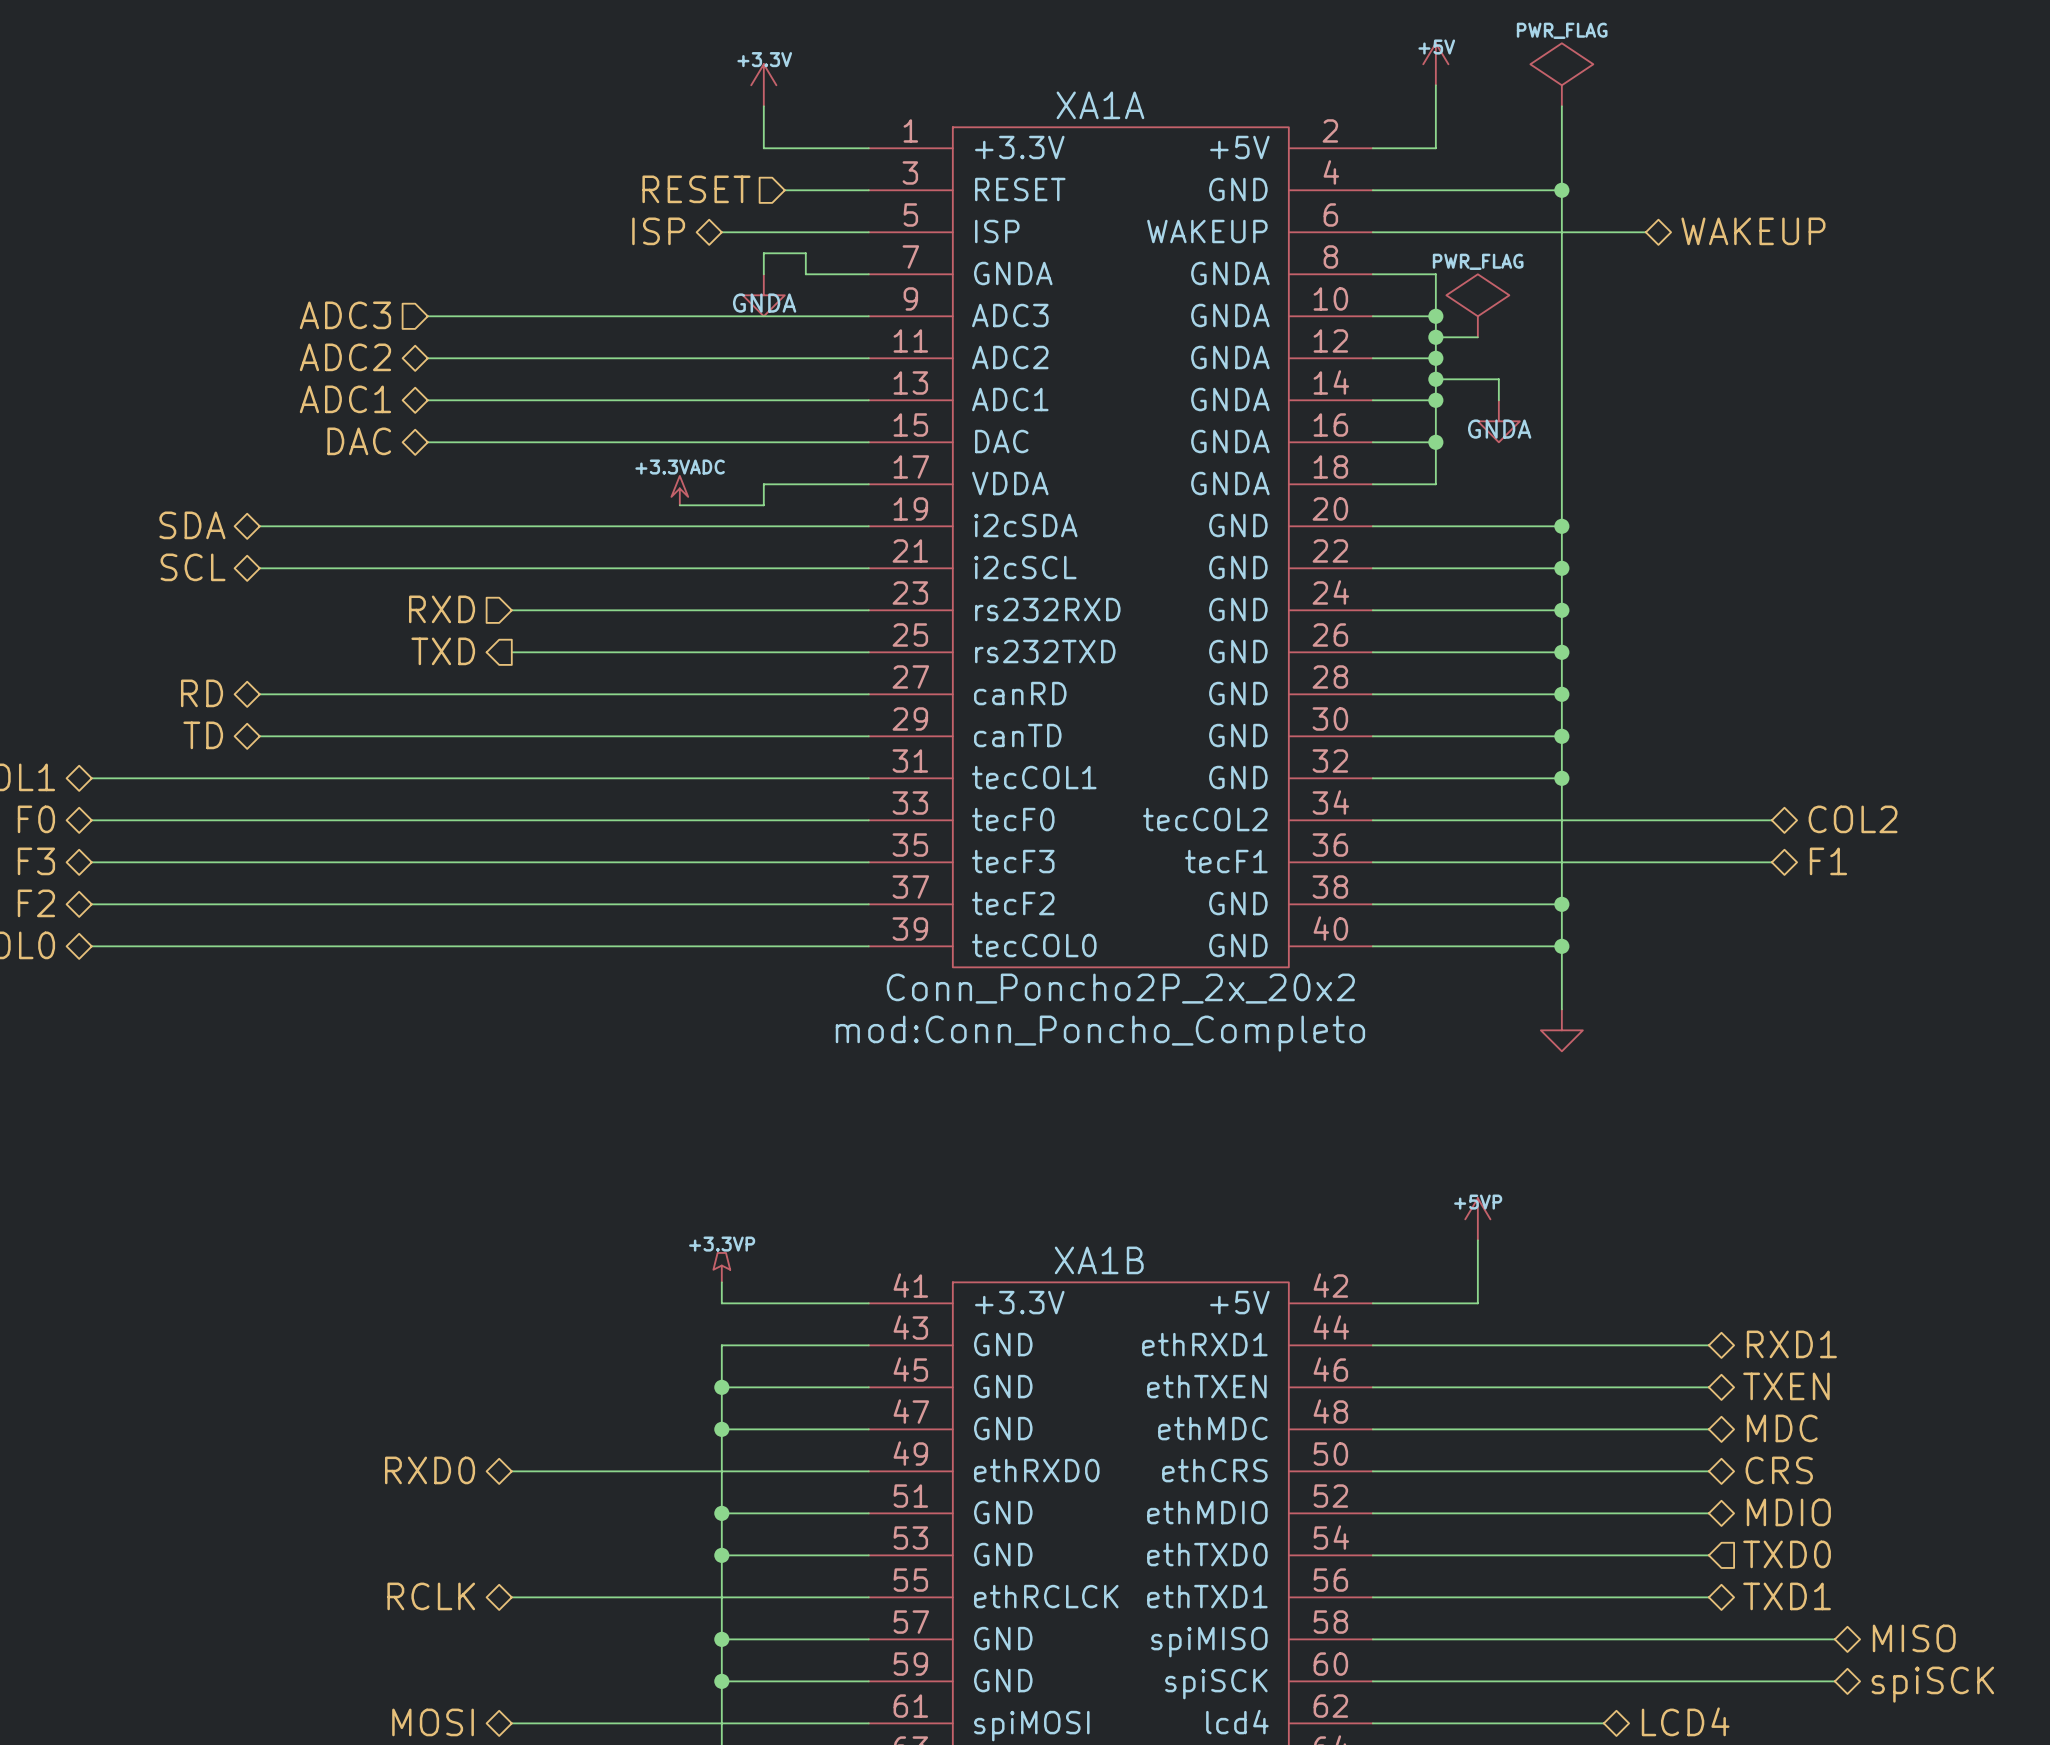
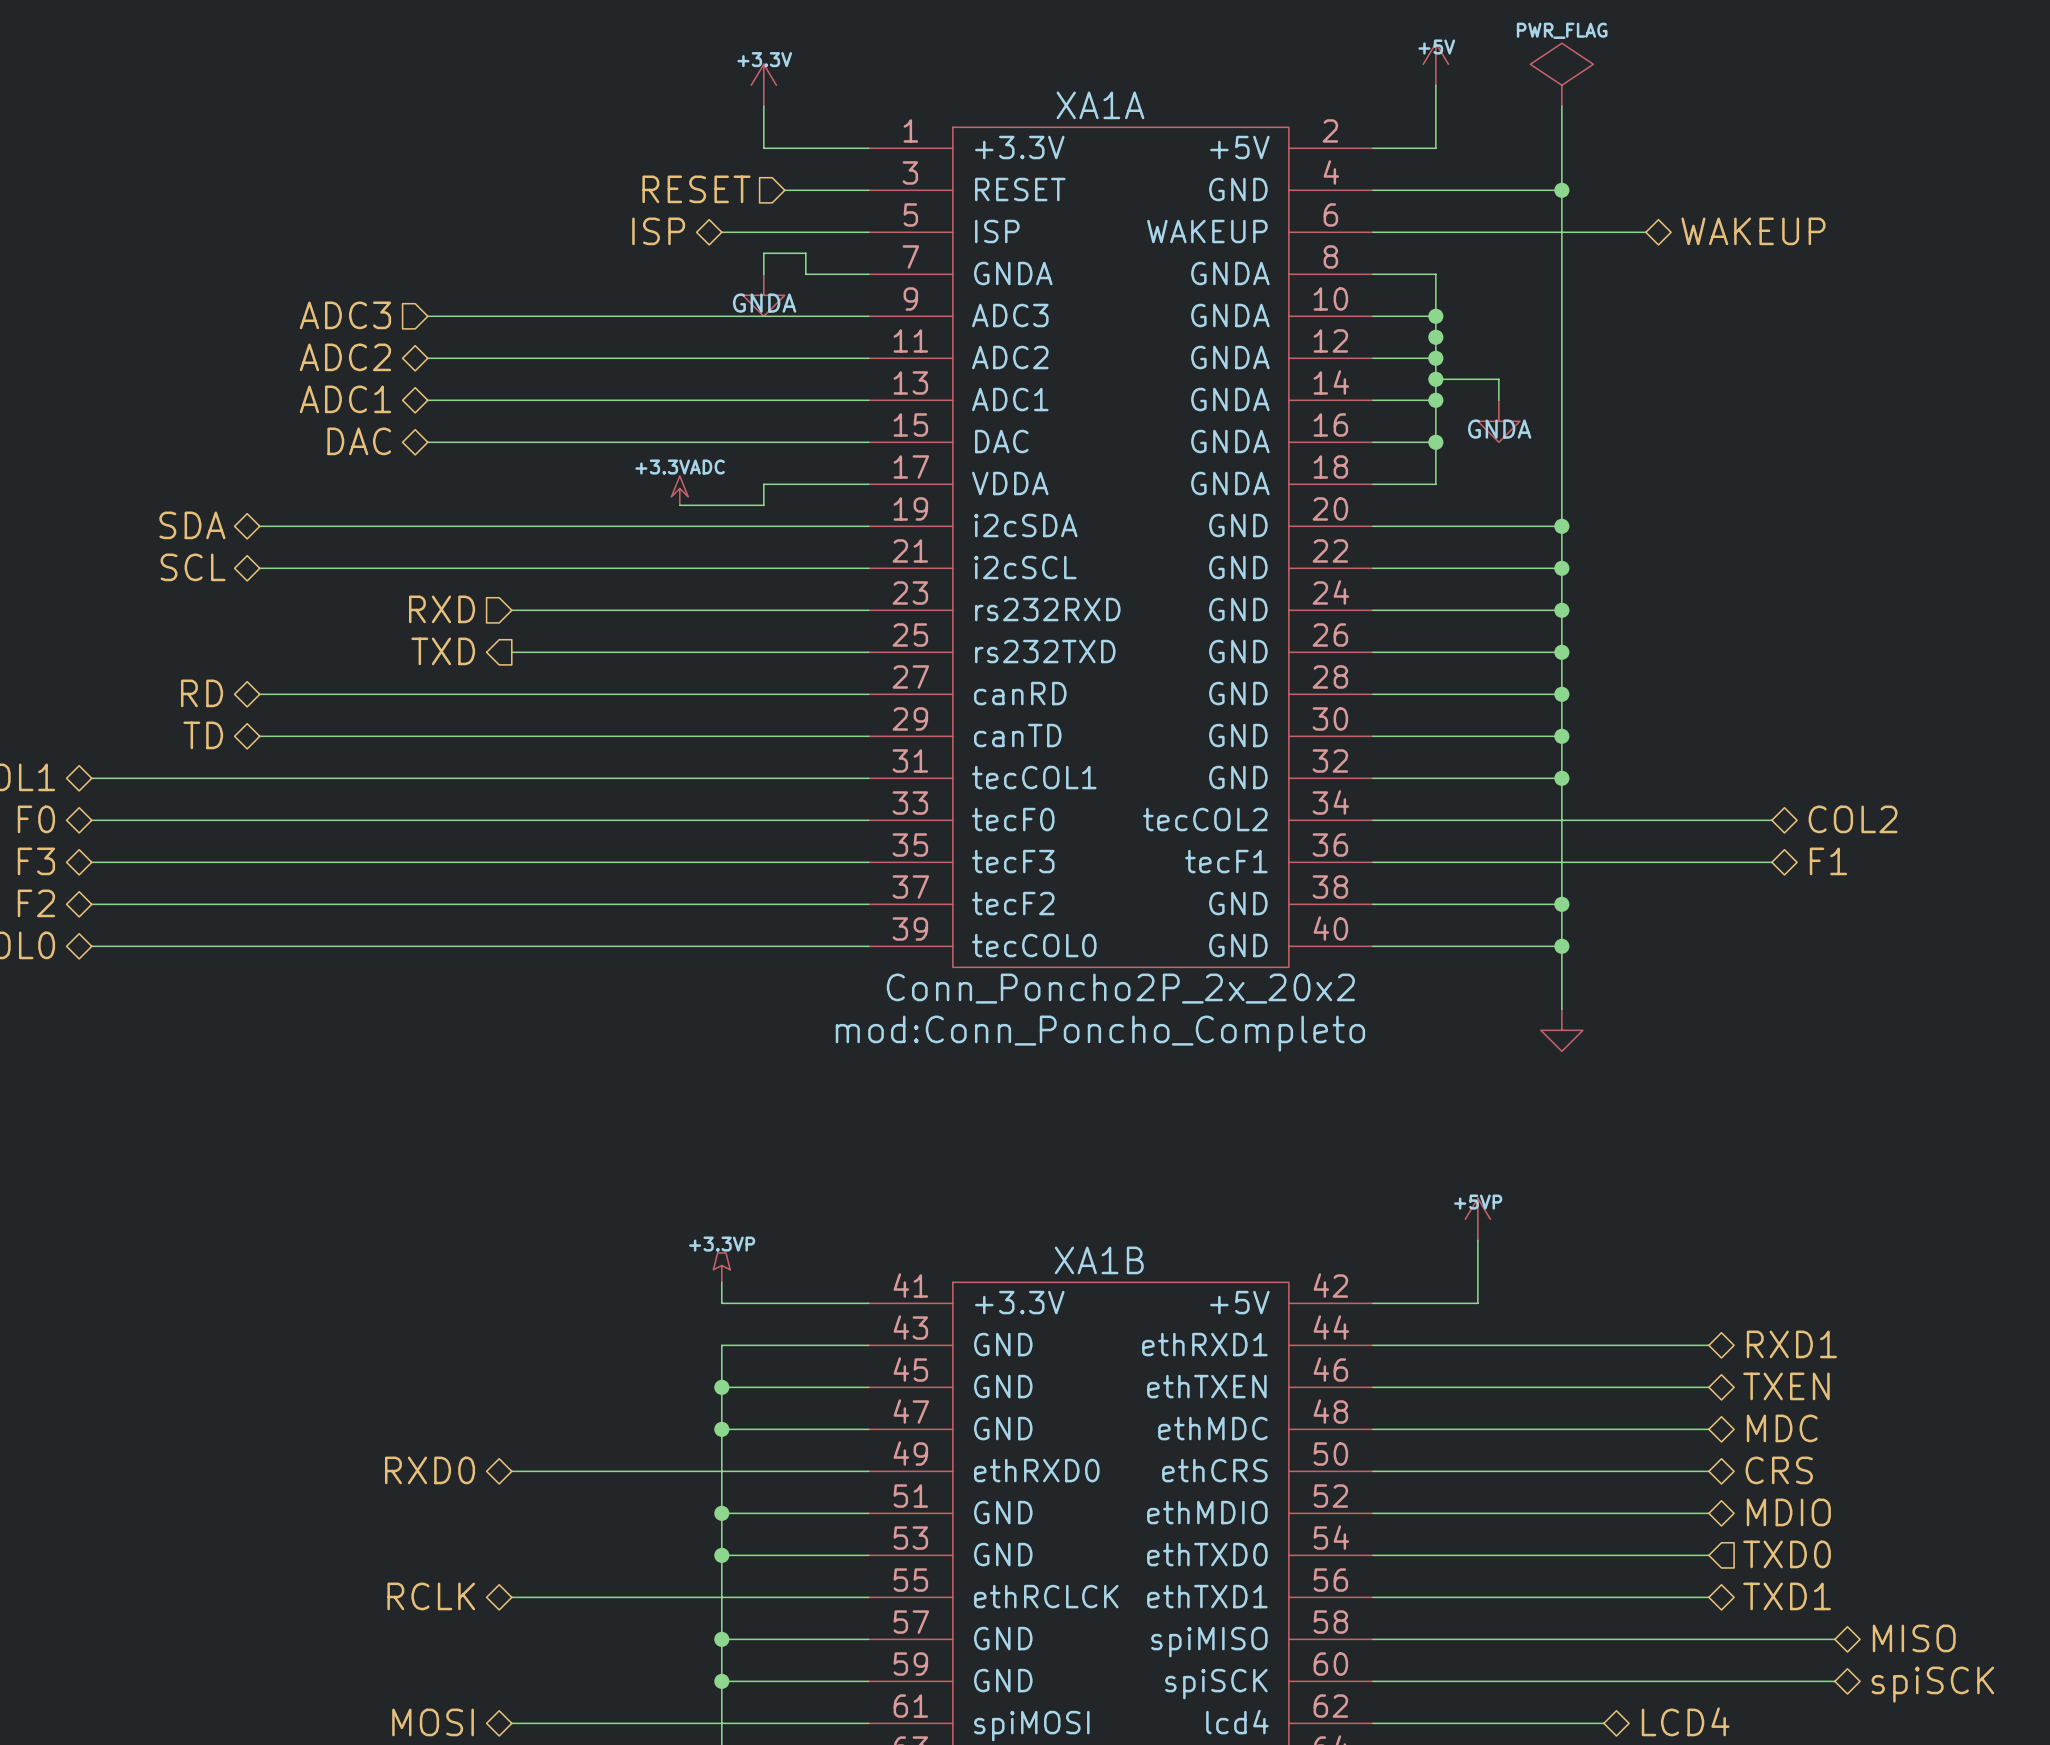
power symbol: PWR_FLAG (1477, 305) -> none
wire: (1435, 337) (1477, 337) -> none

